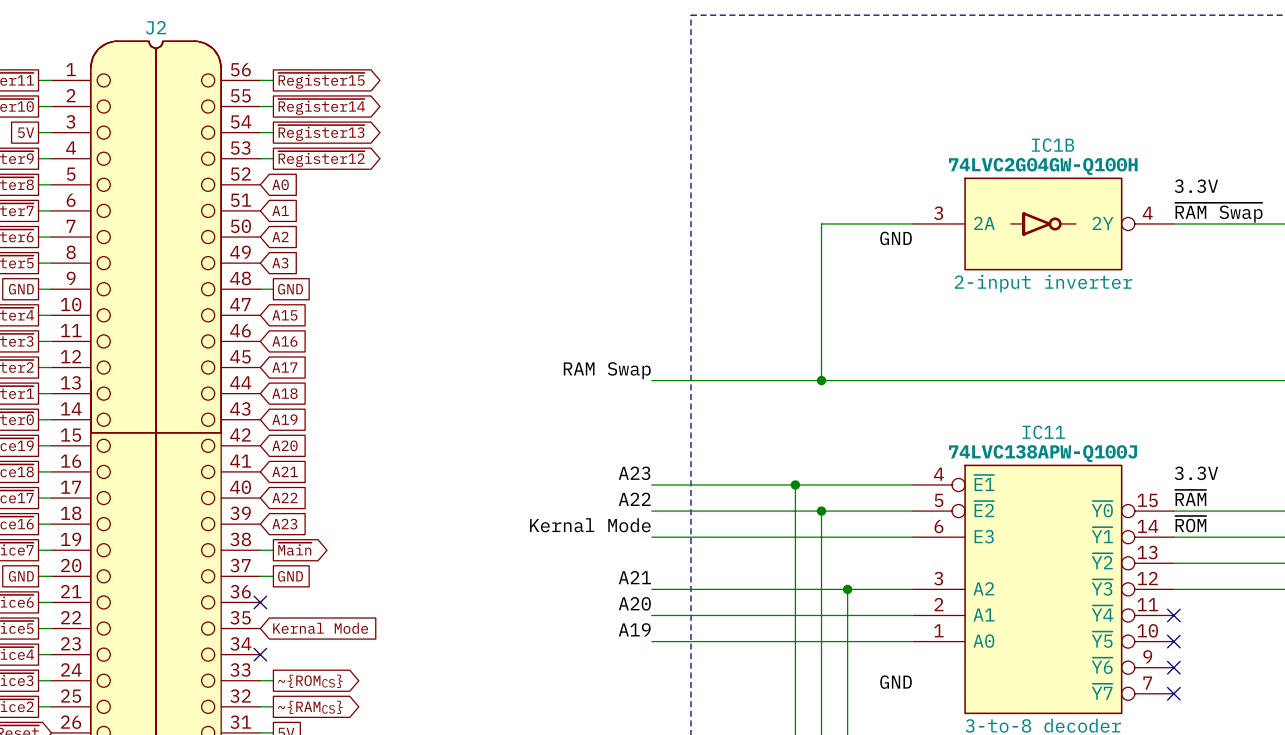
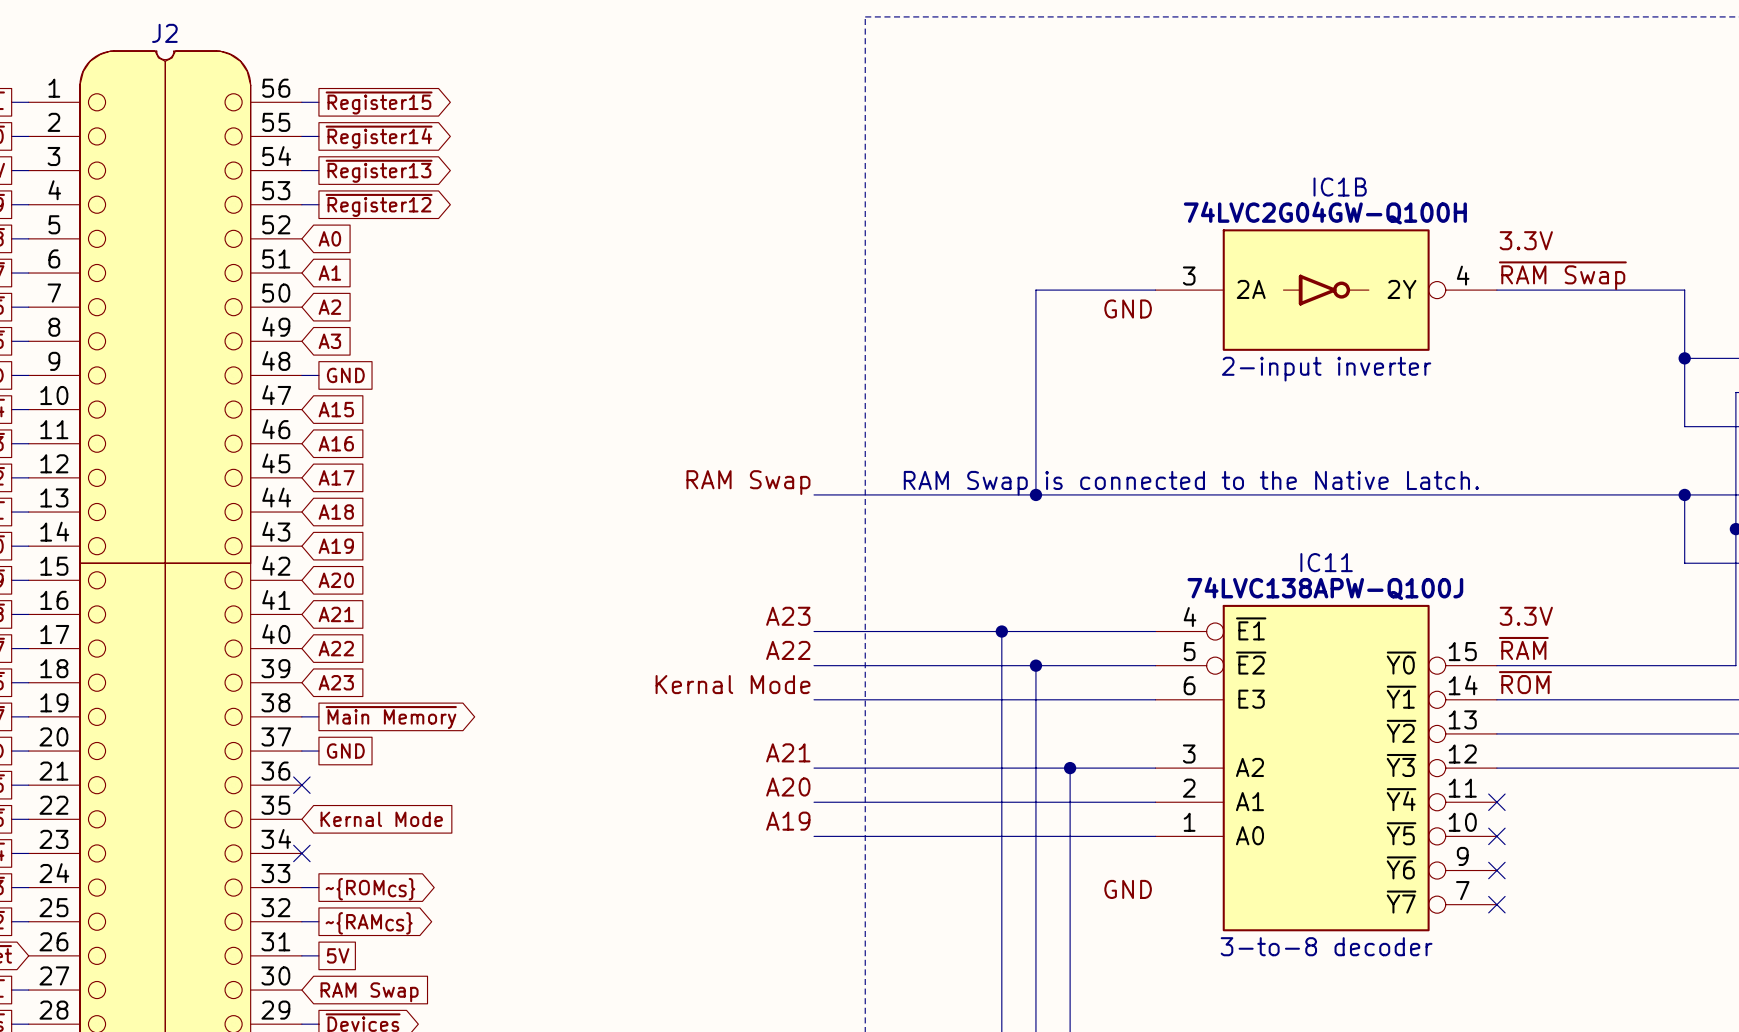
text: none -> RAM Swap is connected to the Native Latch. (1191, 483)
global label: ~{Main} (294, 549) -> ~{Main Memory} (391, 717)

